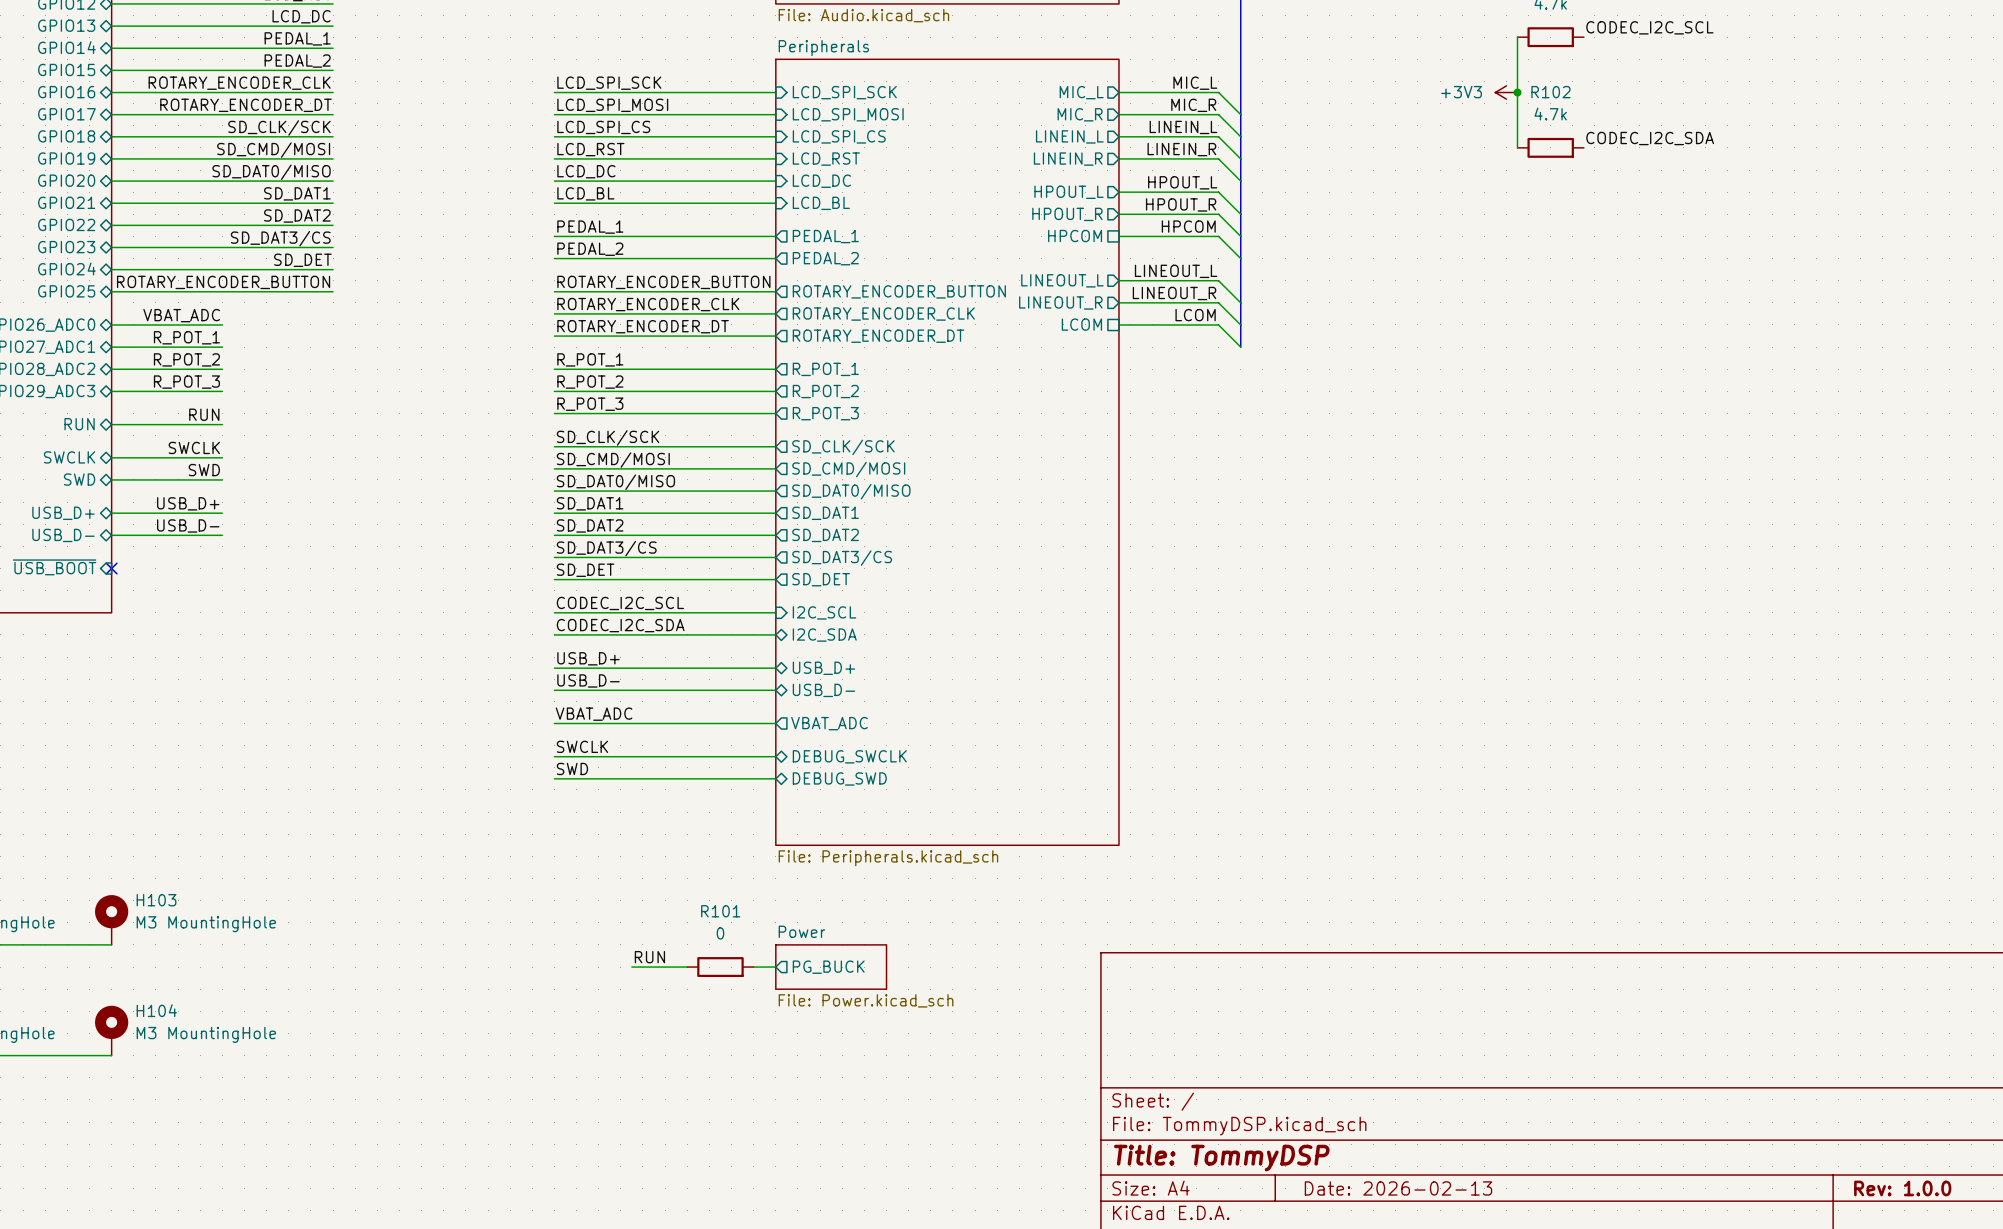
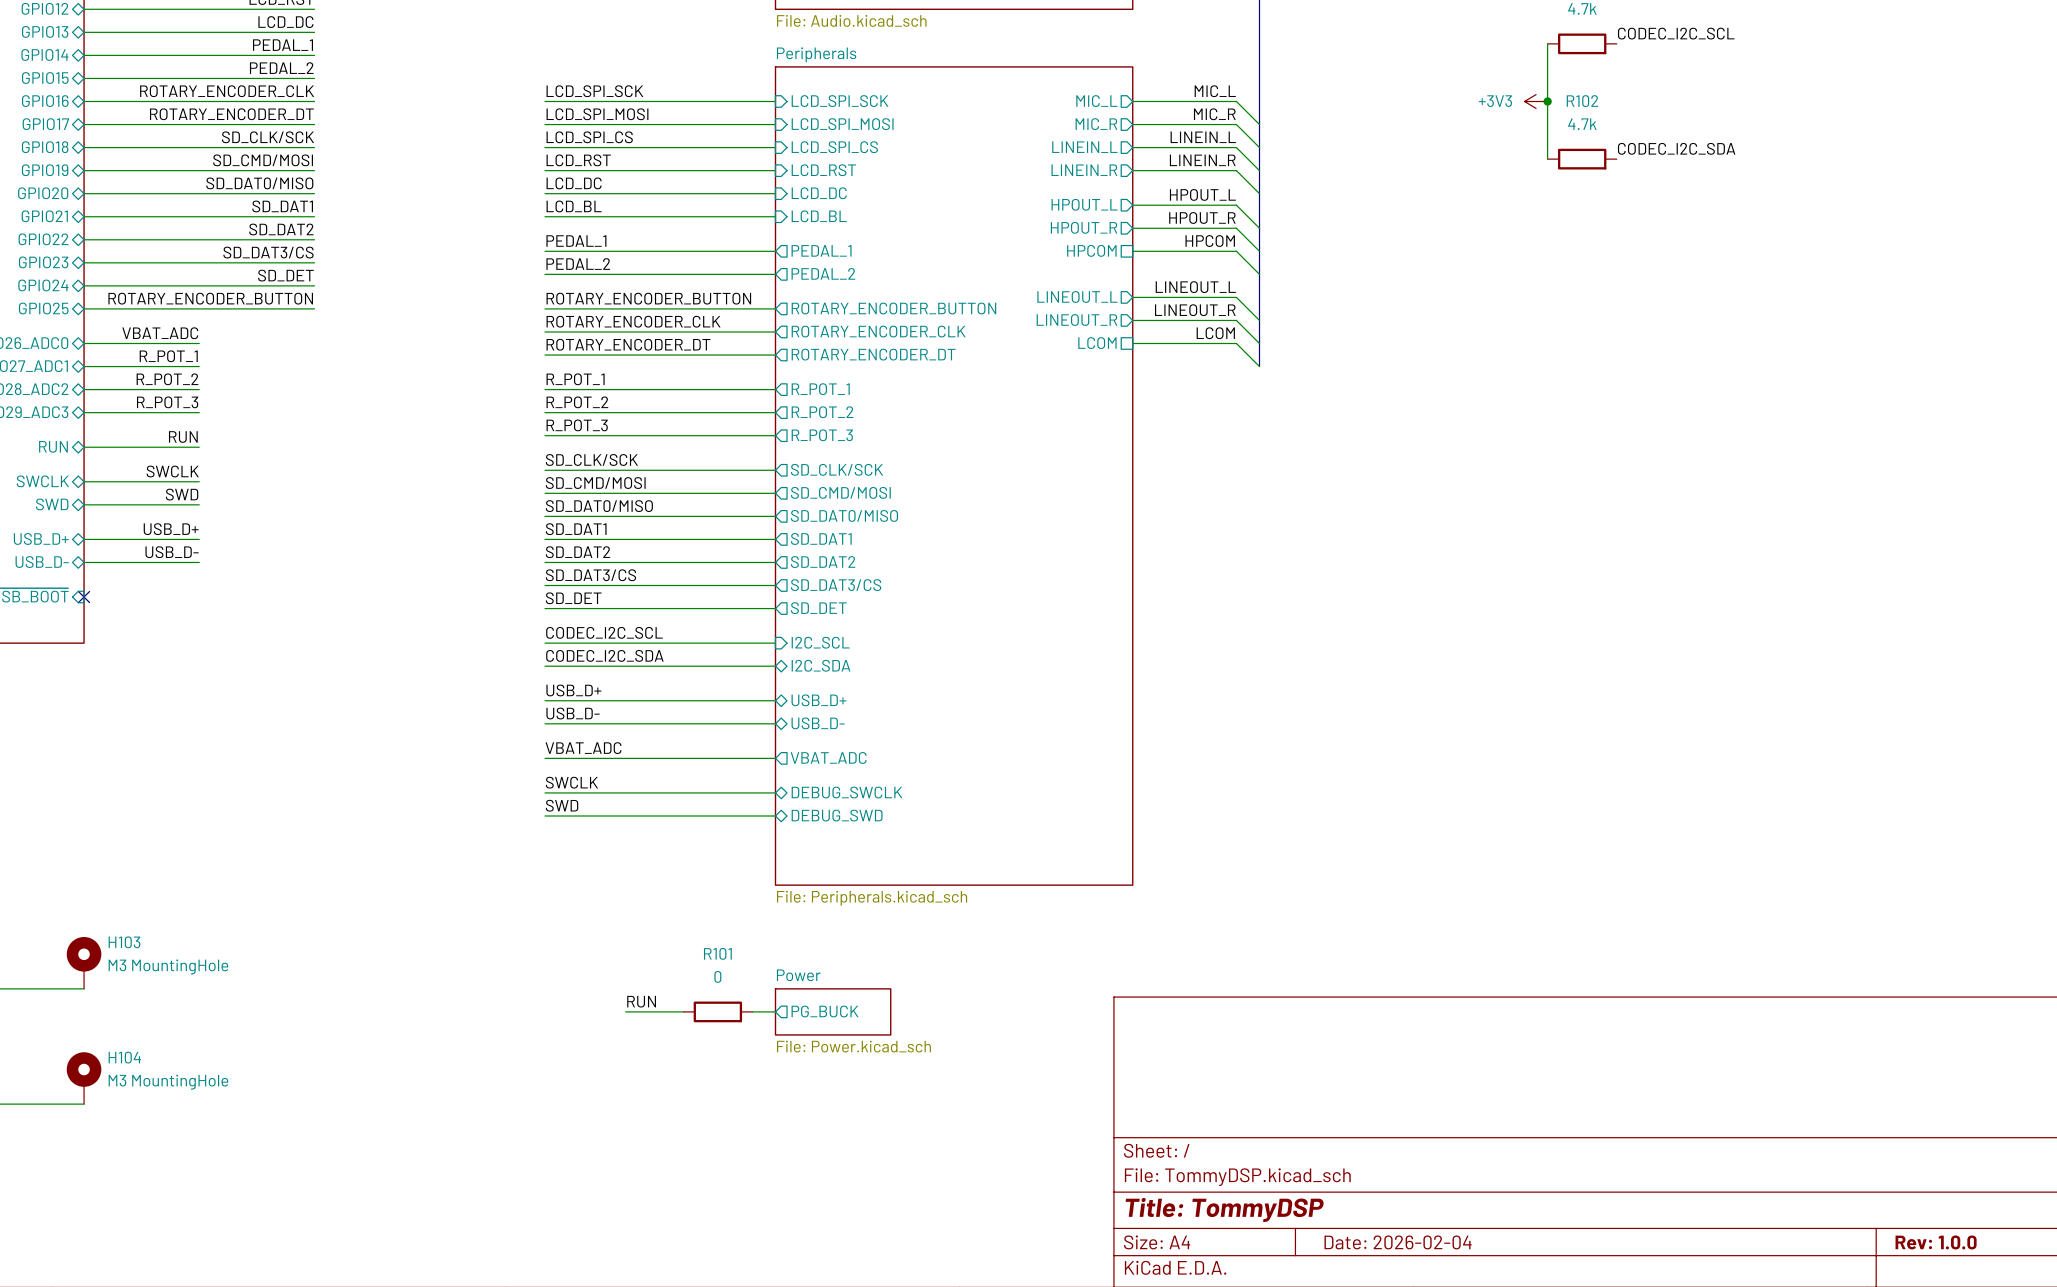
title block: Date: 2026-02-13 (1398, 1188) -> Date: 2026-02-04 (1398, 1242)

